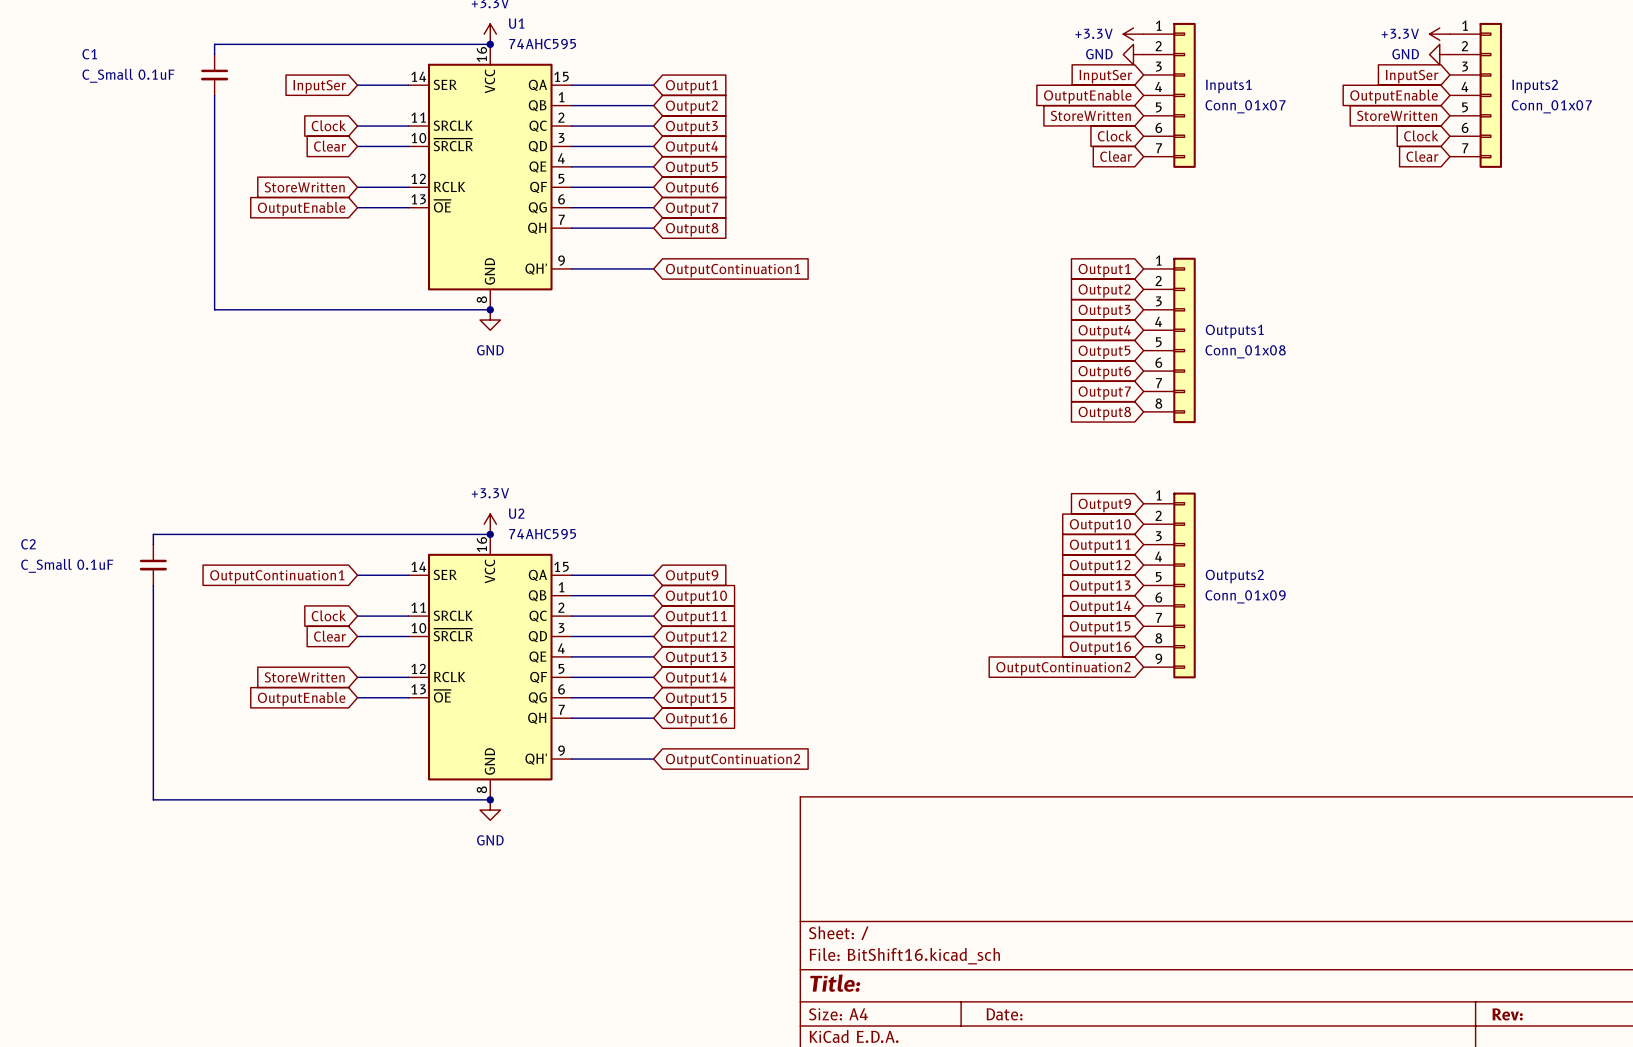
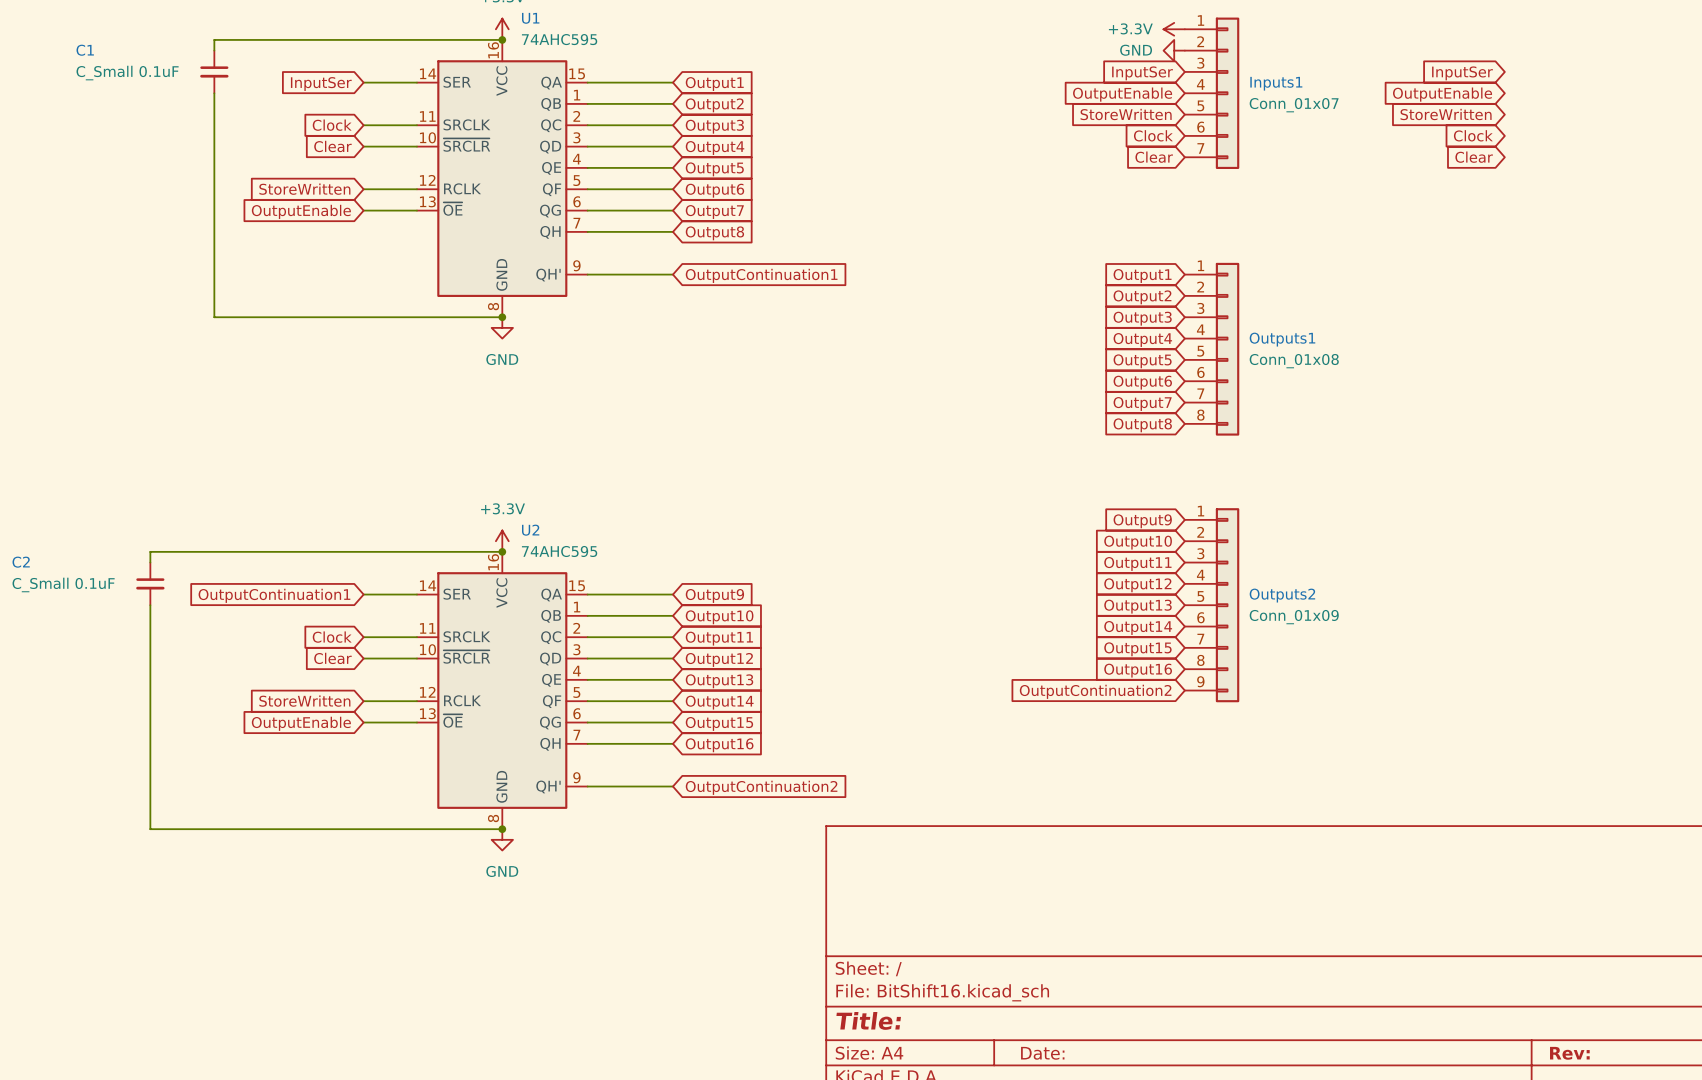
power symbol: +3.3V (1439, 34) -> none
power symbol: GND (1439, 54) -> none
Inputs2: Conn_01x07 (1475, 95) -> none

